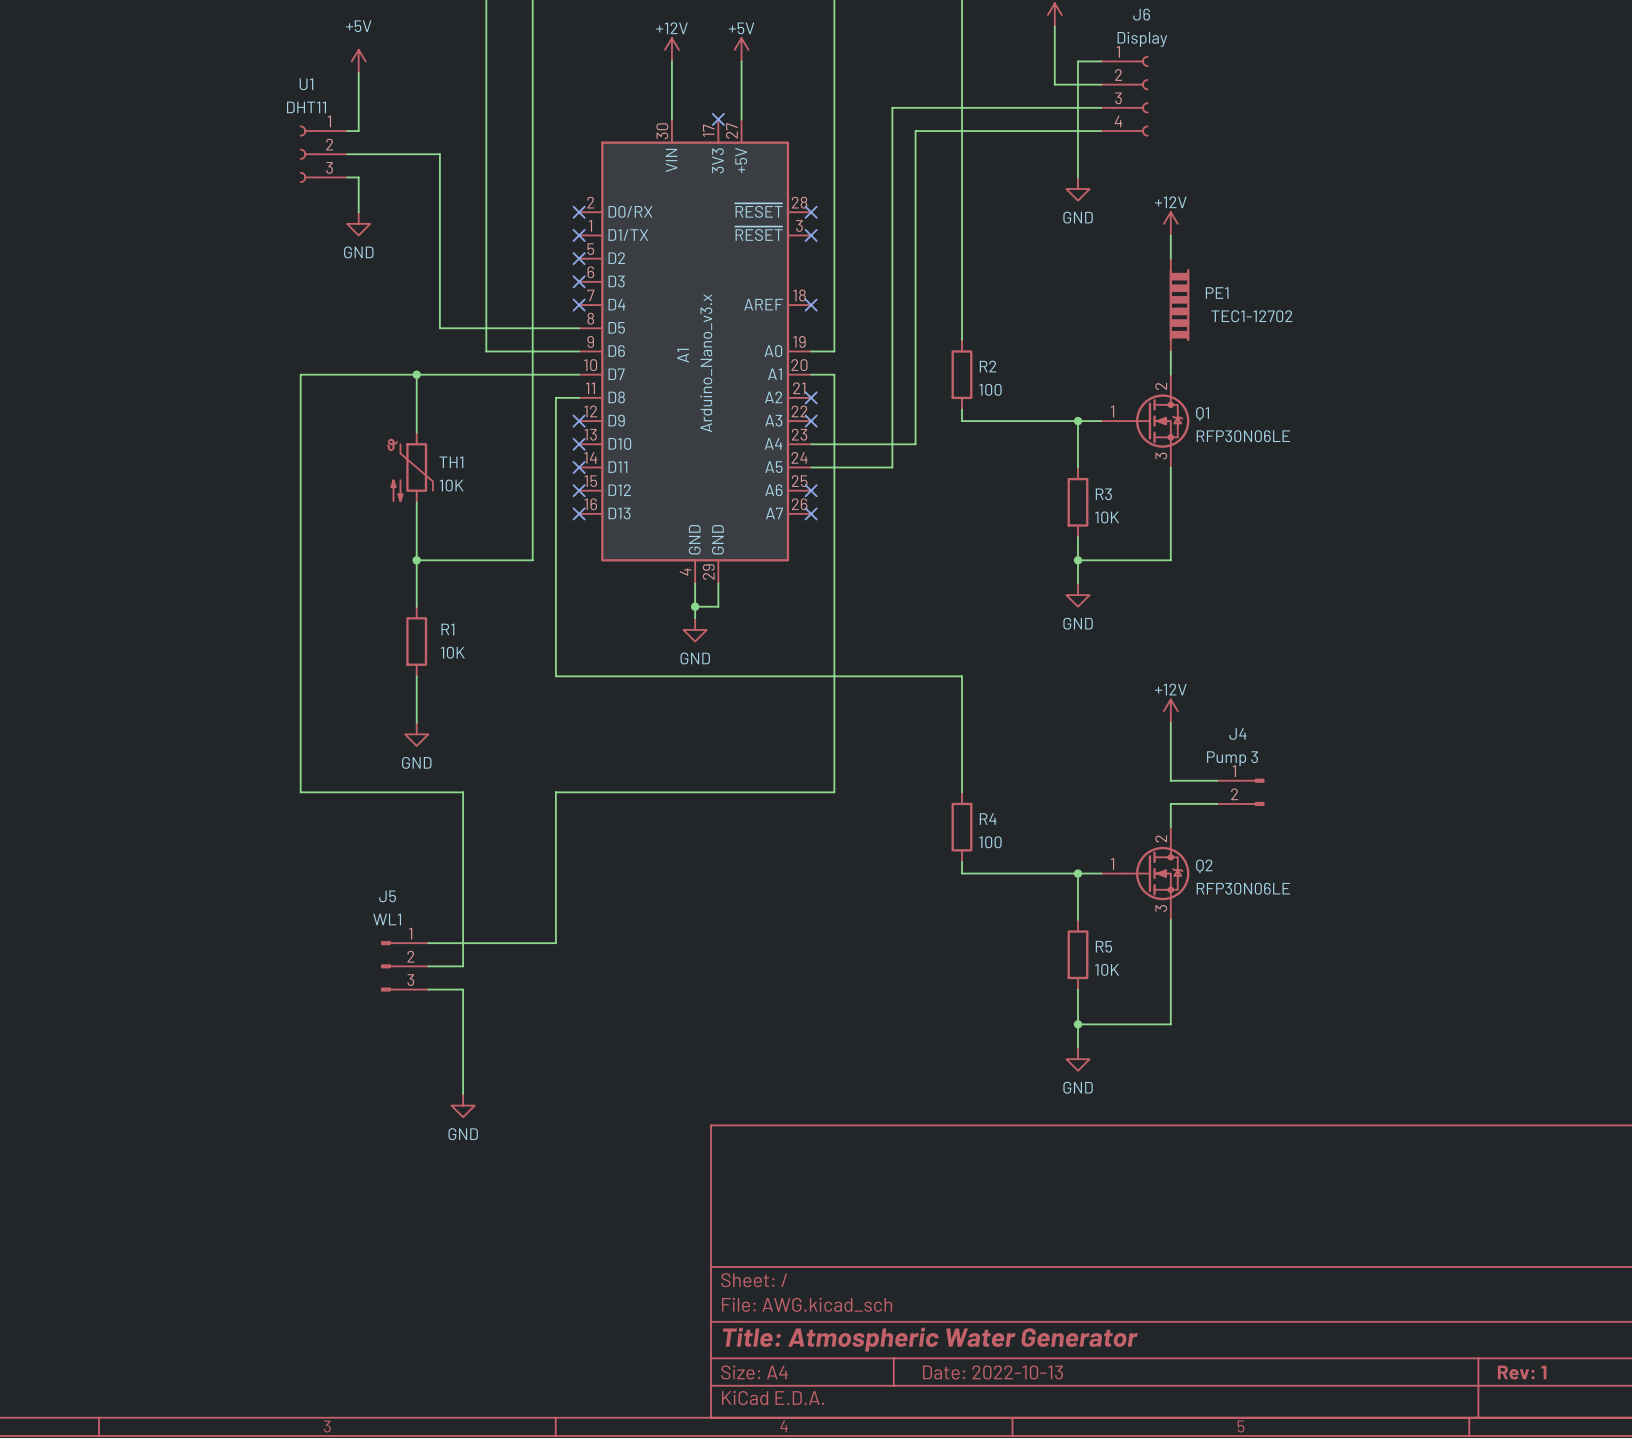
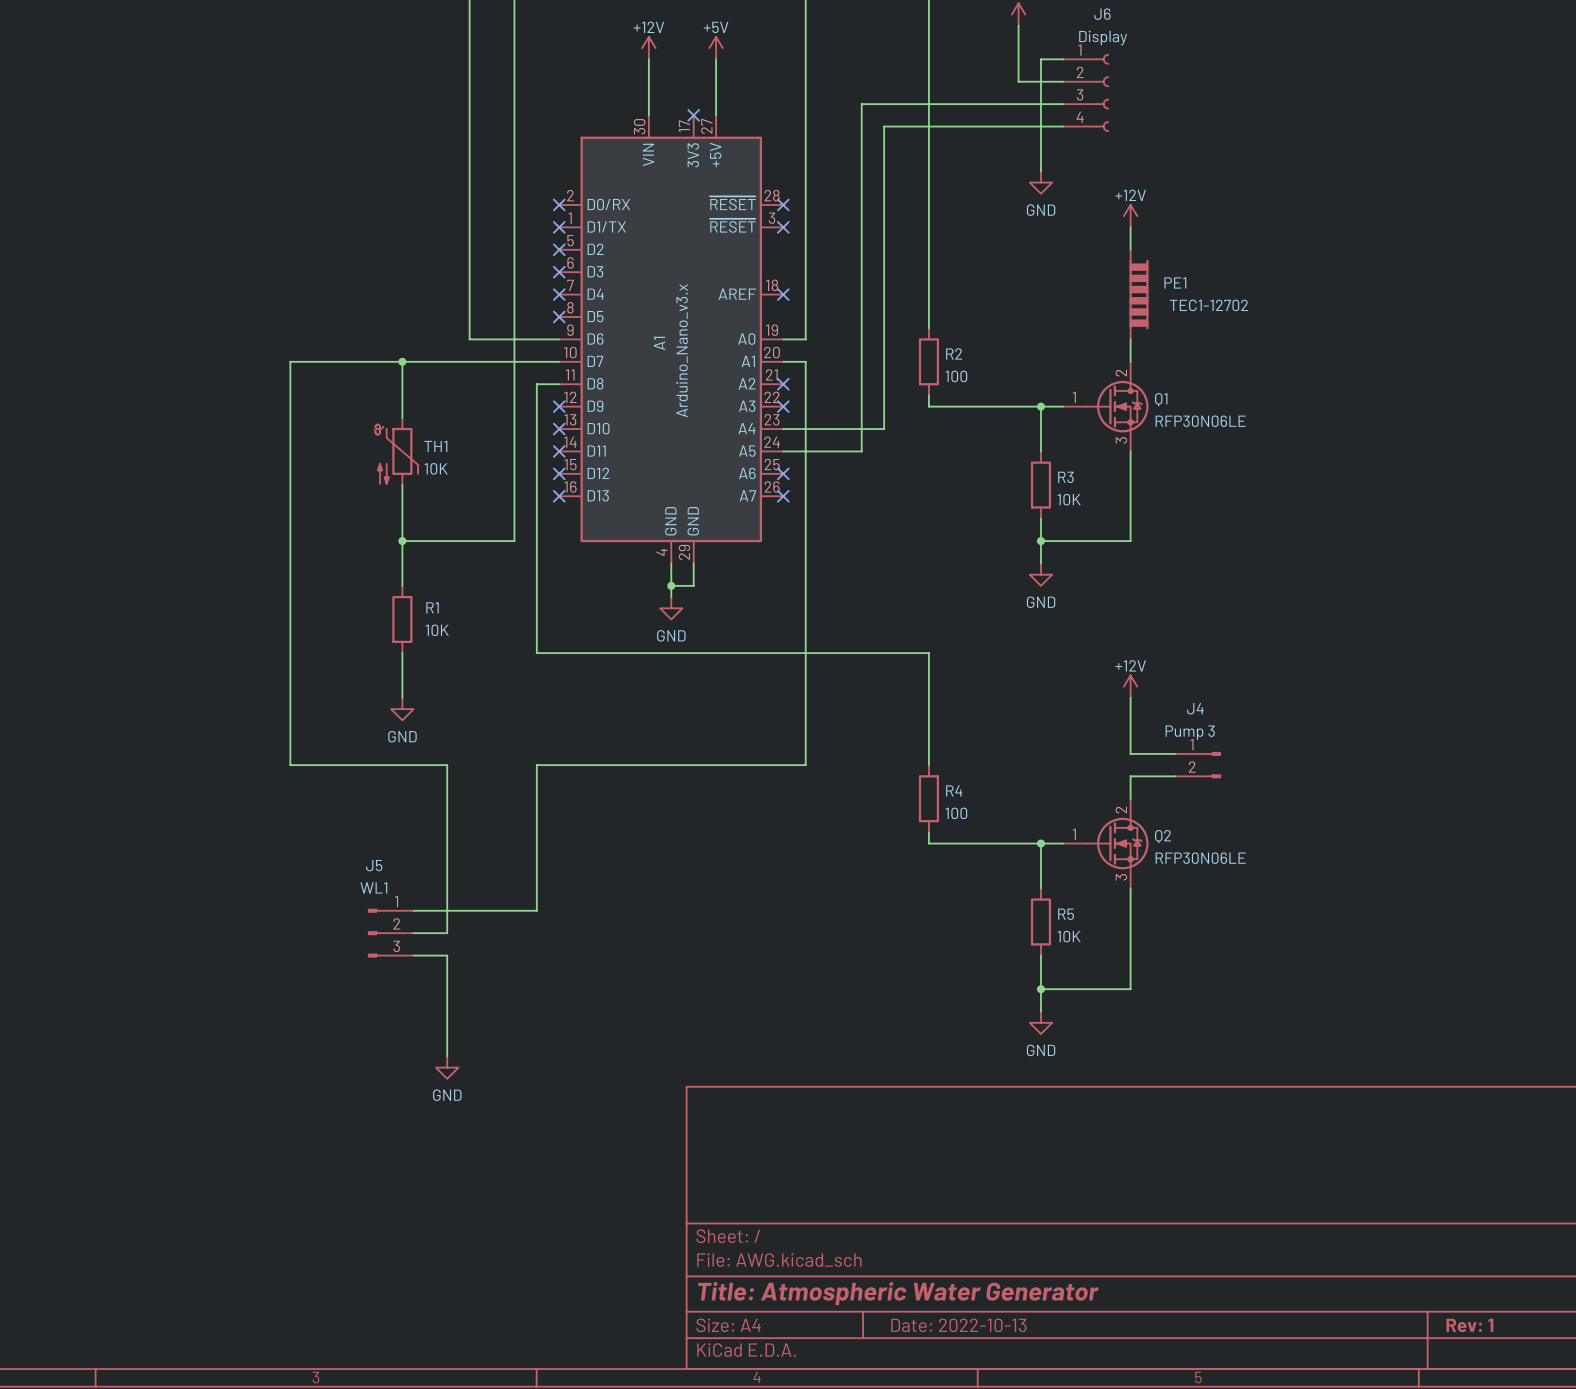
power symbol: +5V (358, 61) -> none
wire: (358, 73) (358, 131) (347, 131) -> none
U1: DHT11 (323, 154) -> none
wire: (347, 154) (439, 154) (439, 328) (579, 328) -> none
wire: (347, 177) (358, 177) (358, 212) -> none
power symbol: GND (358, 223) -> none
no-connect mark: none -> (559, 317)

